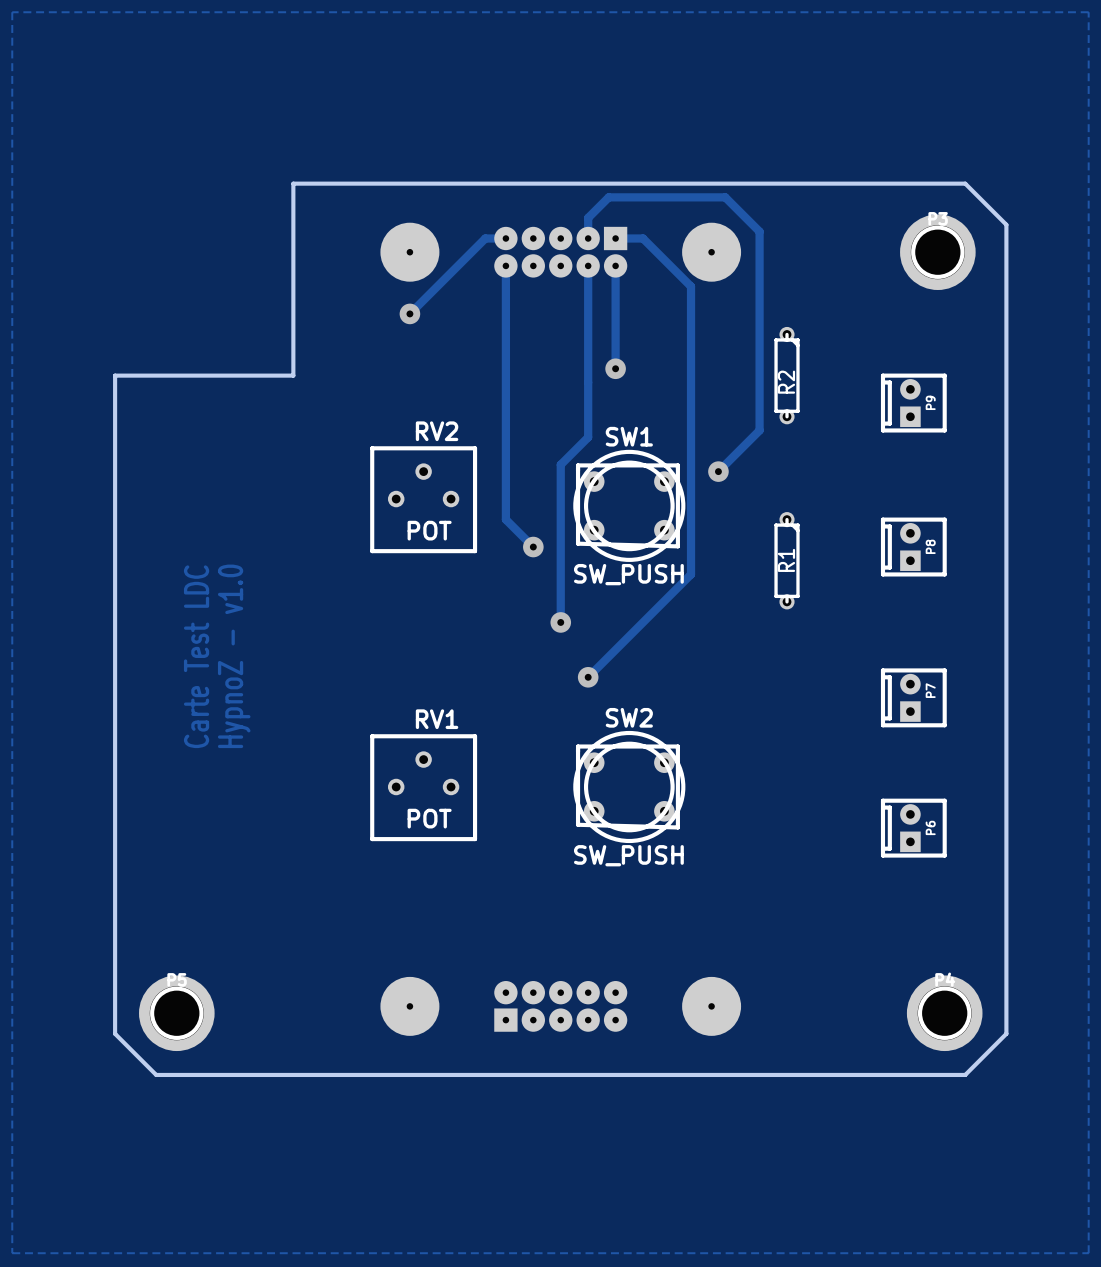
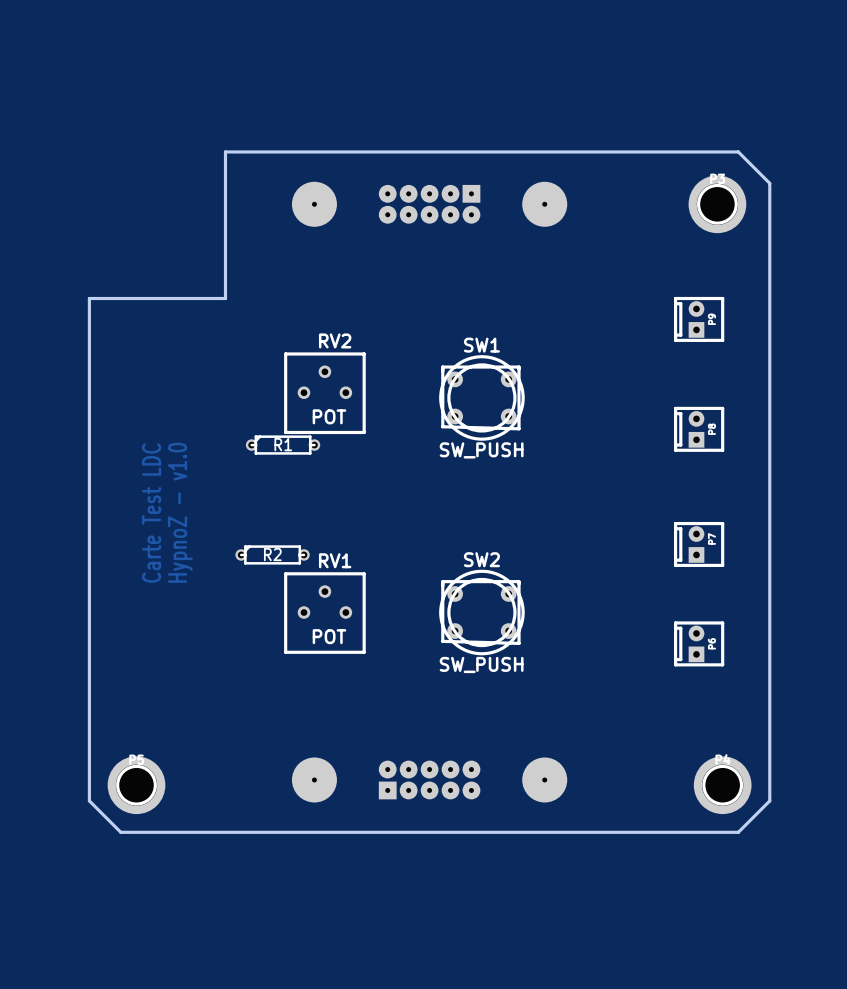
zone outline: (12, 12) (1088, 12) (1088, 1253) (12, 1253) (12, 12) -> none
track: (505, 238) (485, 238) (409, 313) -> none
track: (588, 238) (588, 217) (608, 197) (725, 197) (759, 231) (759, 430) (718, 471) -> none
track: (615, 238) (643, 238) (691, 286) (691, 574) (588, 677) -> none
track: (505, 265) (505, 519) (533, 547) -> none
track: (588, 265) (588, 437) (560, 464) (560, 622) -> none
track: (615, 265) (615, 368) -> none
via: (409, 313) -> none
via: (615, 368) -> none
R2 rotation: 0° (787, 375) -> 90° counterclockwise (272, 554)
R2 position: (787, 375) -> (272, 554)
via: (718, 471) -> none
via: (533, 547) -> none
R1 rotation: 0° (787, 560) -> 90° counterclockwise (283, 445)
R1 position: (787, 560) -> (283, 445)
via: (560, 622) -> none
via: (588, 677) -> none

